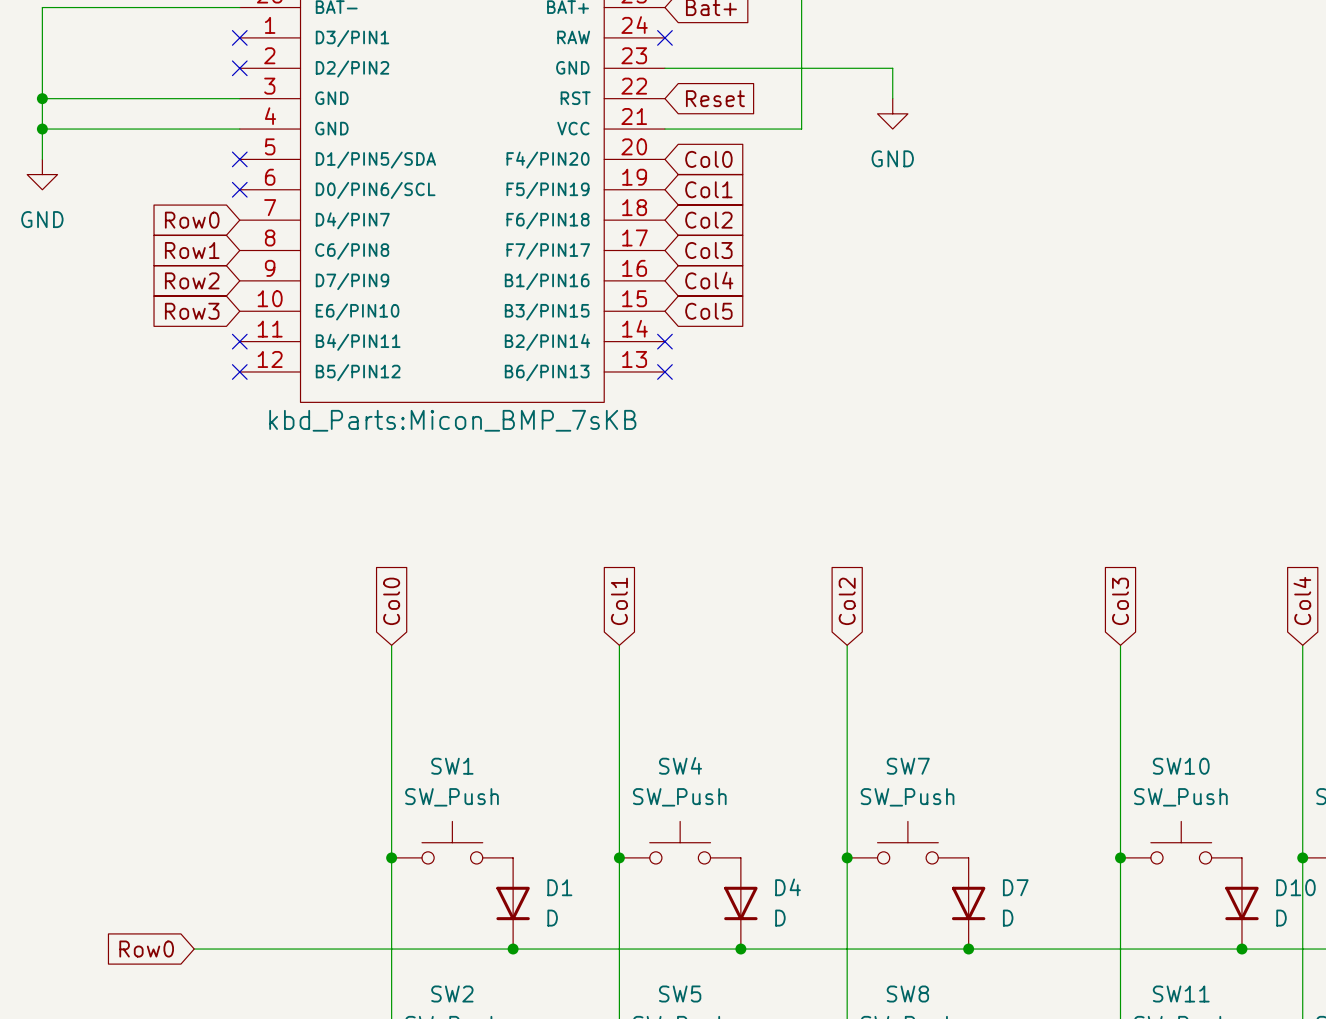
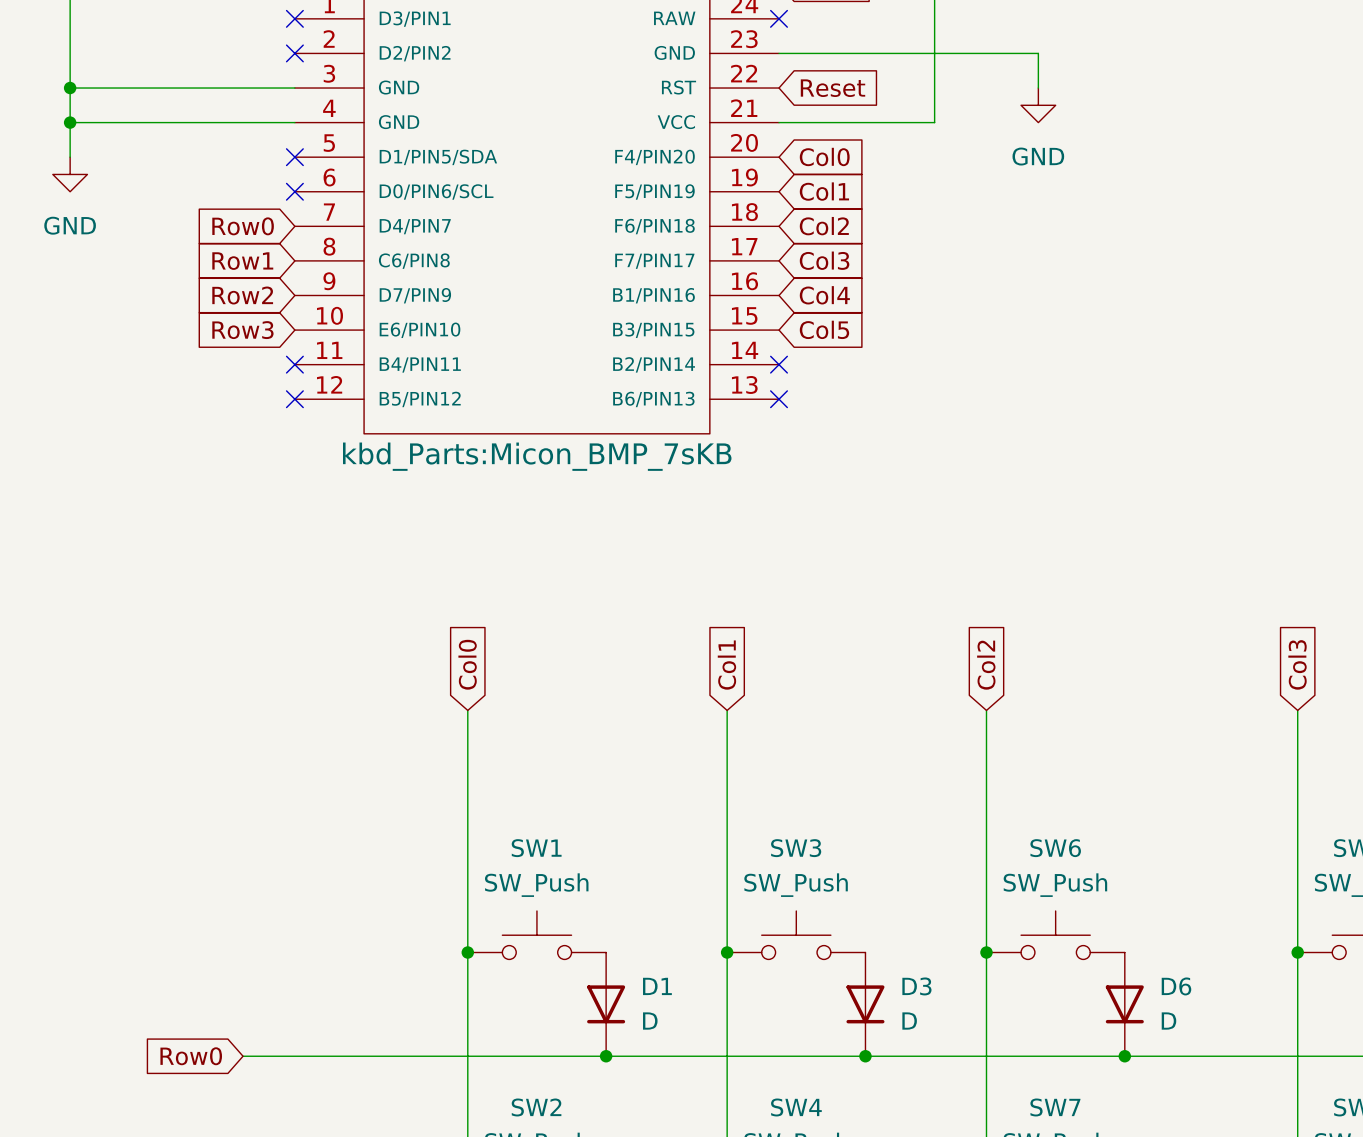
SW4 name: SW4 (680, 765) -> SW3 (796, 848)
SW7 name: SW7 (908, 766) -> SW6 (1055, 848)
D4 name: D4 (787, 887) -> D3 (916, 986)
D7 name: D7 (1015, 887) -> D6 (1176, 986)
SW5 name: SW5 (680, 994) -> SW4 (796, 1107)
SW8 name: SW8 (907, 994) -> SW7 (1055, 1107)

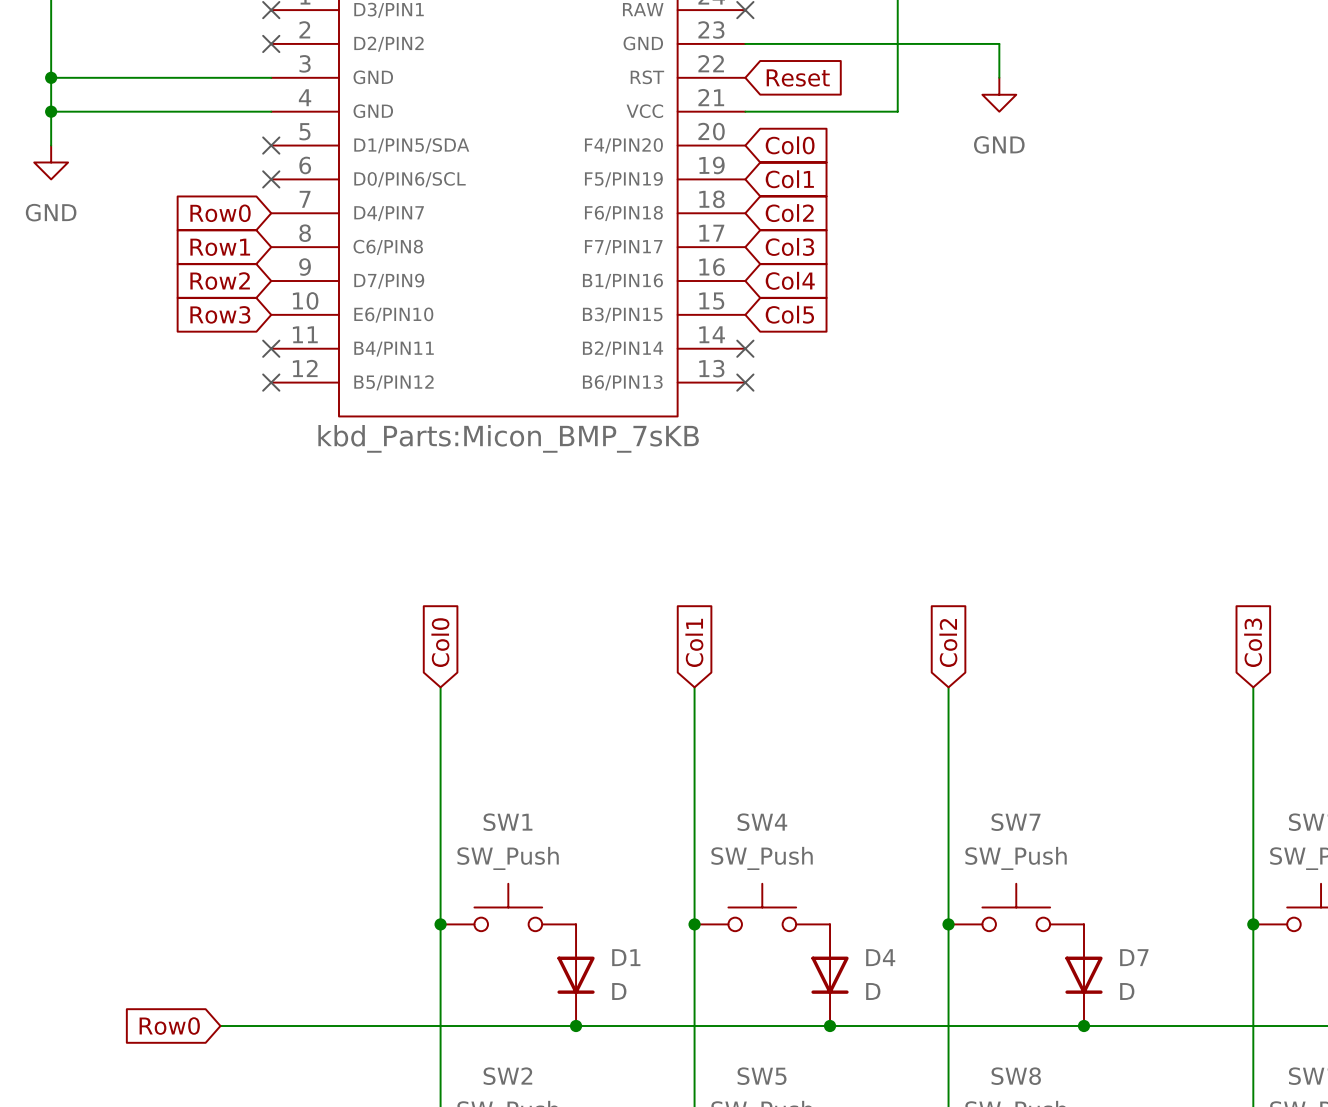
SW3 name: SW3 (796, 848) -> SW4 (762, 822)
SW6 name: SW6 (1055, 848) -> SW7 (1016, 822)
D3 name: D3 (916, 986) -> D4 (880, 957)
D6 name: D6 (1176, 986) -> D7 (1134, 957)
SW4 name: SW4 (796, 1107) -> SW5 (762, 1076)
SW7 name: SW7 (1055, 1107) -> SW8 (1016, 1076)

